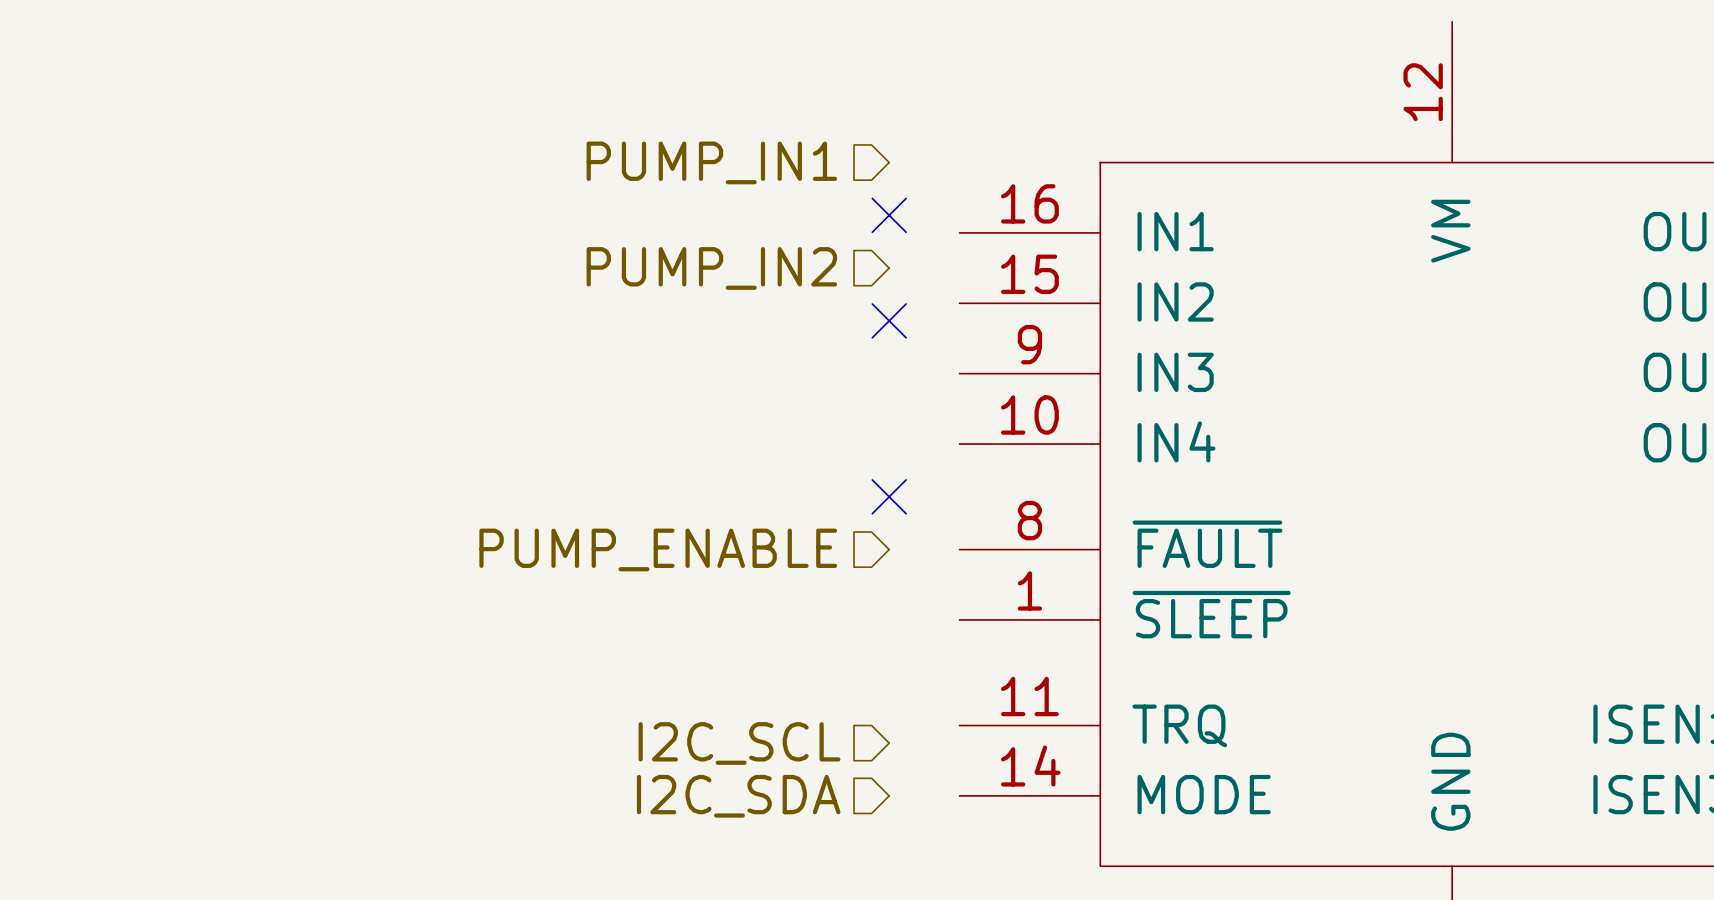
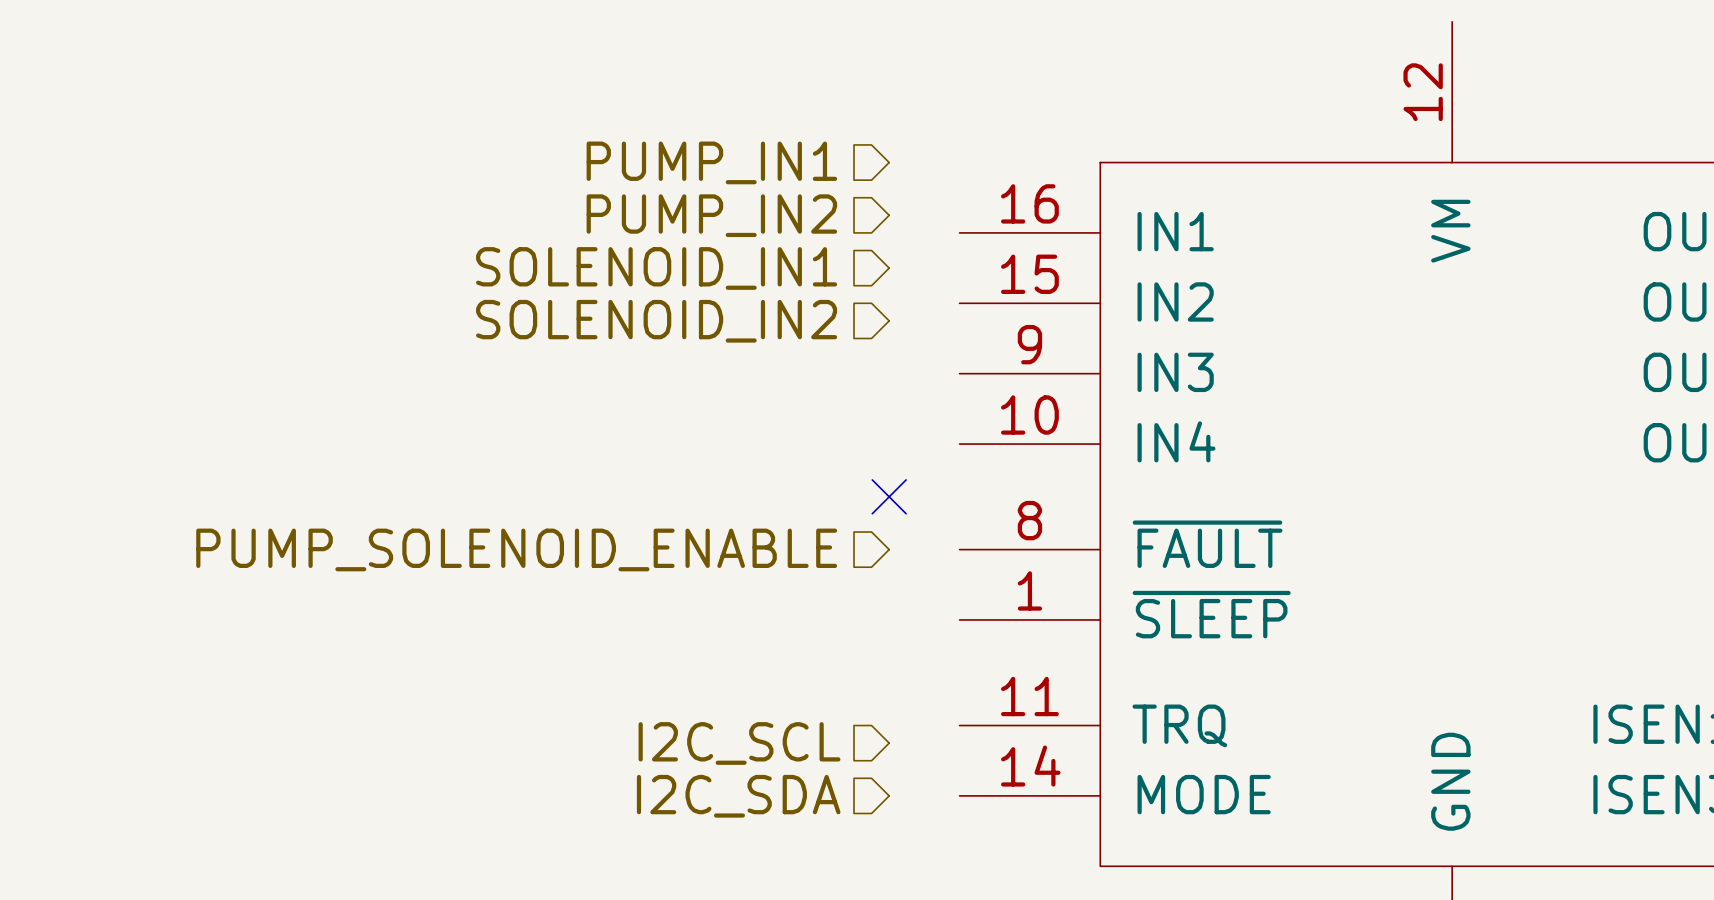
hierarchical label: none -> PUMP_IN2 (711, 215)
no-connect mark: (889, 215) -> none
hierarchical label: PUMP_IN2 (711, 268) -> SOLENOID_IN1 (656, 268)
no-connect mark: (889, 320) -> none
hierarchical label: none -> SOLENOID_IN2 (656, 321)
hierarchical label: PUMP_ENABLE (658, 549) -> PUMP_SOLENOID_ENABLE (516, 549)

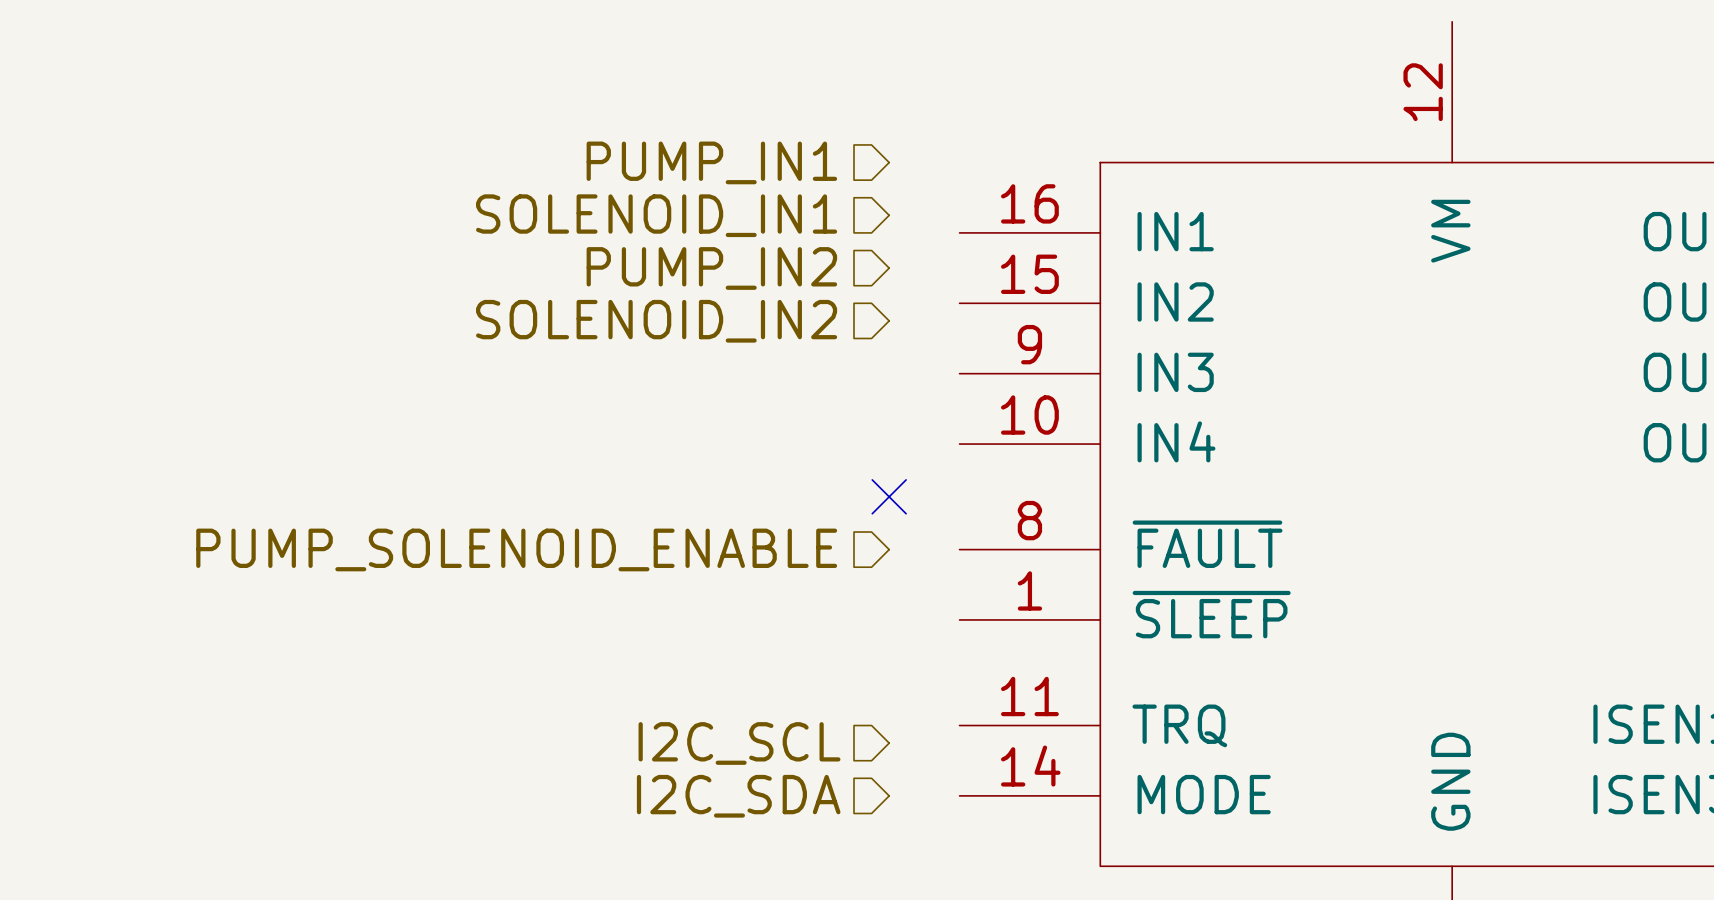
hierarchical label: PUMP_IN2 (711, 215) -> SOLENOID_IN1 (656, 215)
hierarchical label: SOLENOID_IN1 (656, 268) -> PUMP_IN2 (711, 268)

